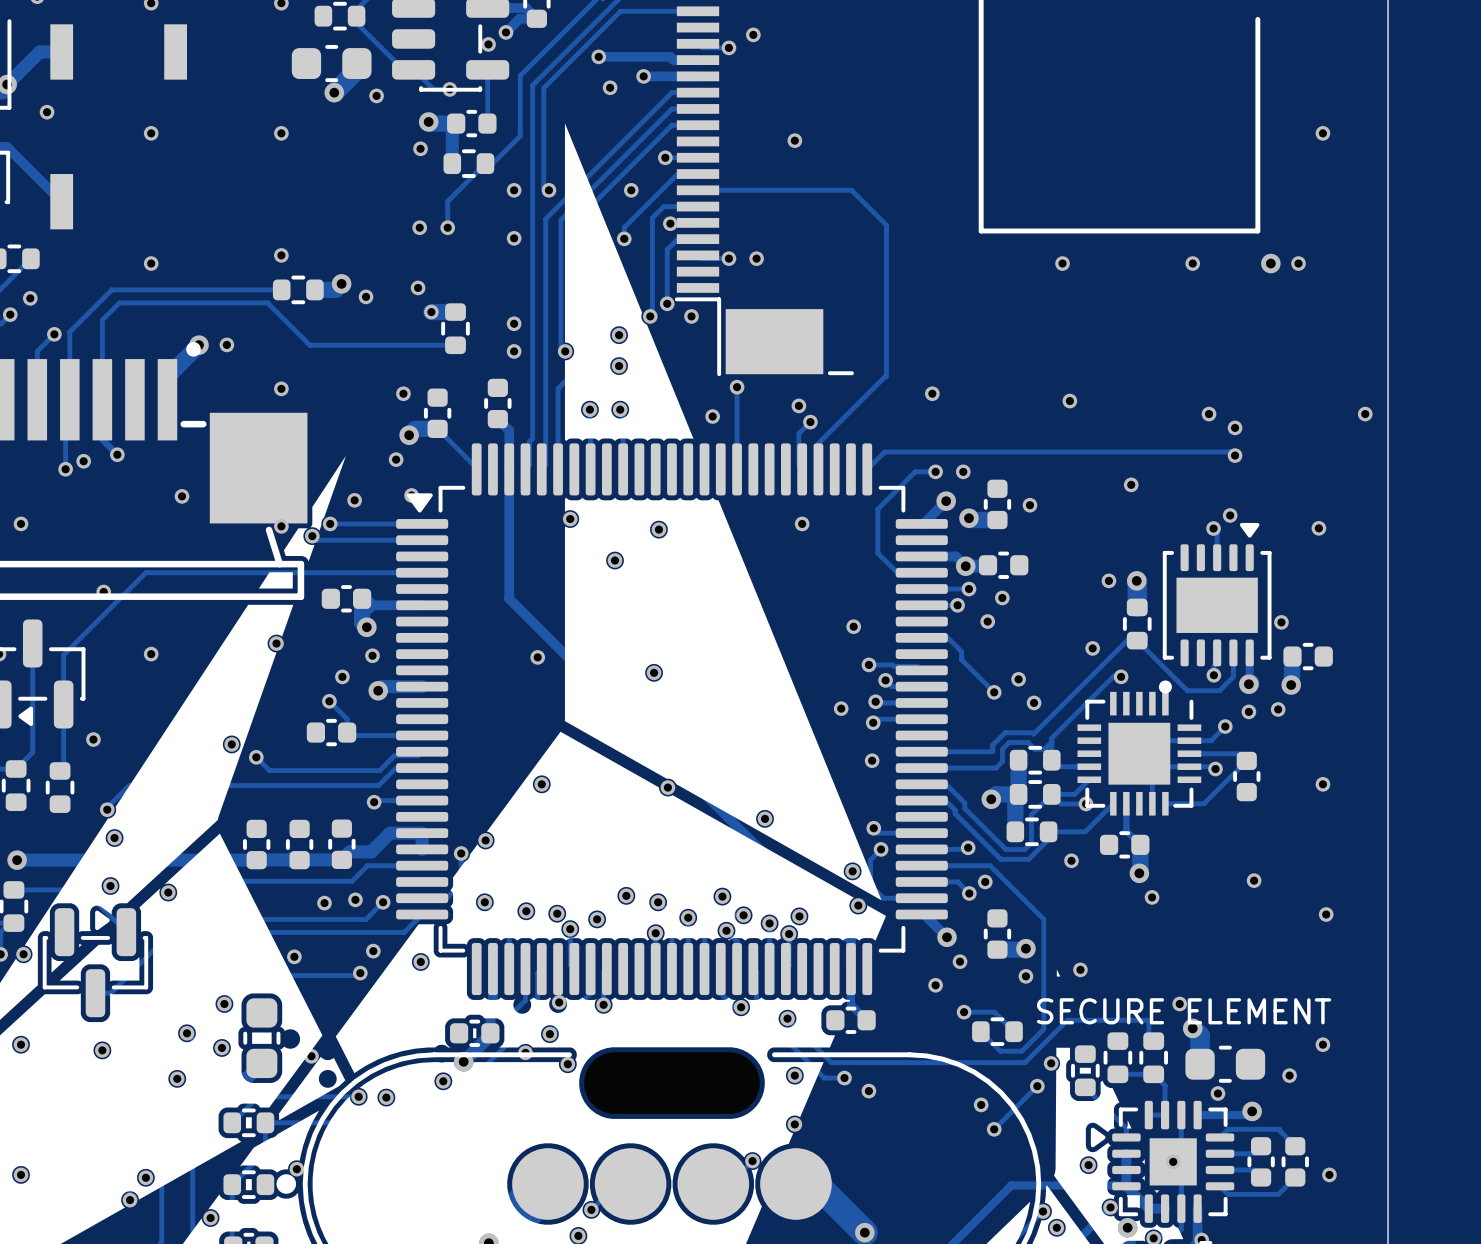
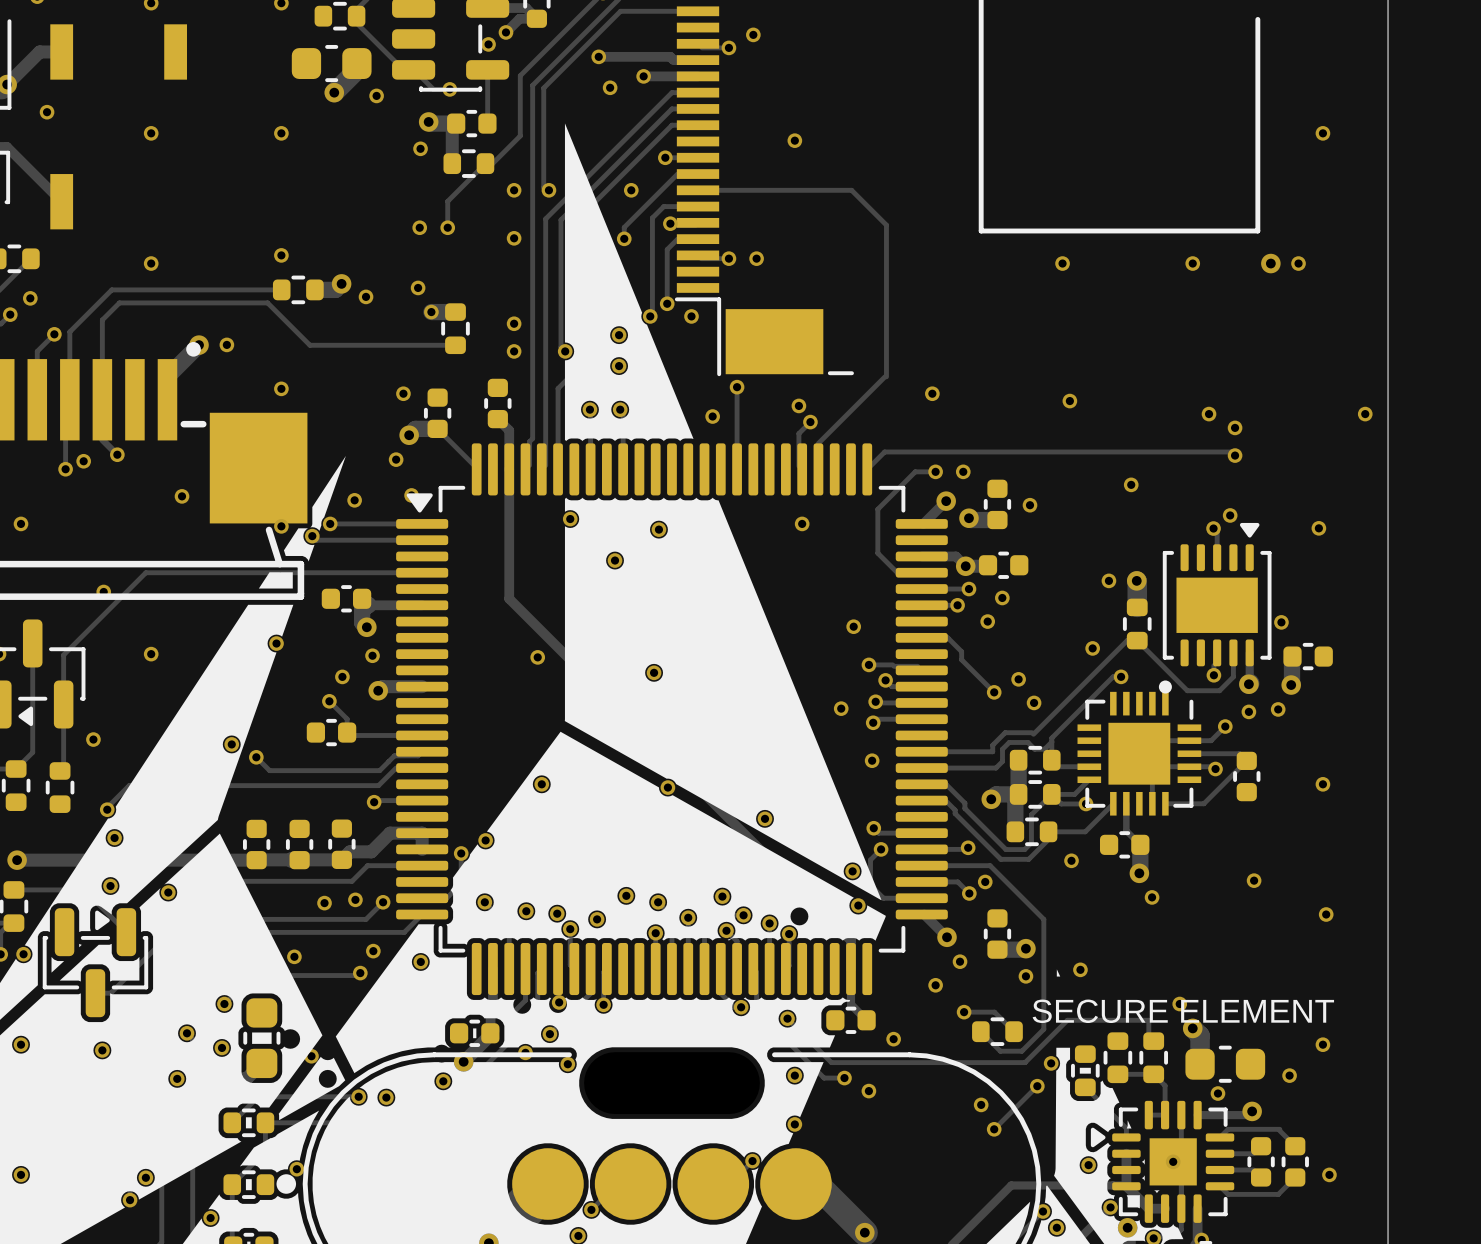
via position: (799, 916) -> (893, 1039)

